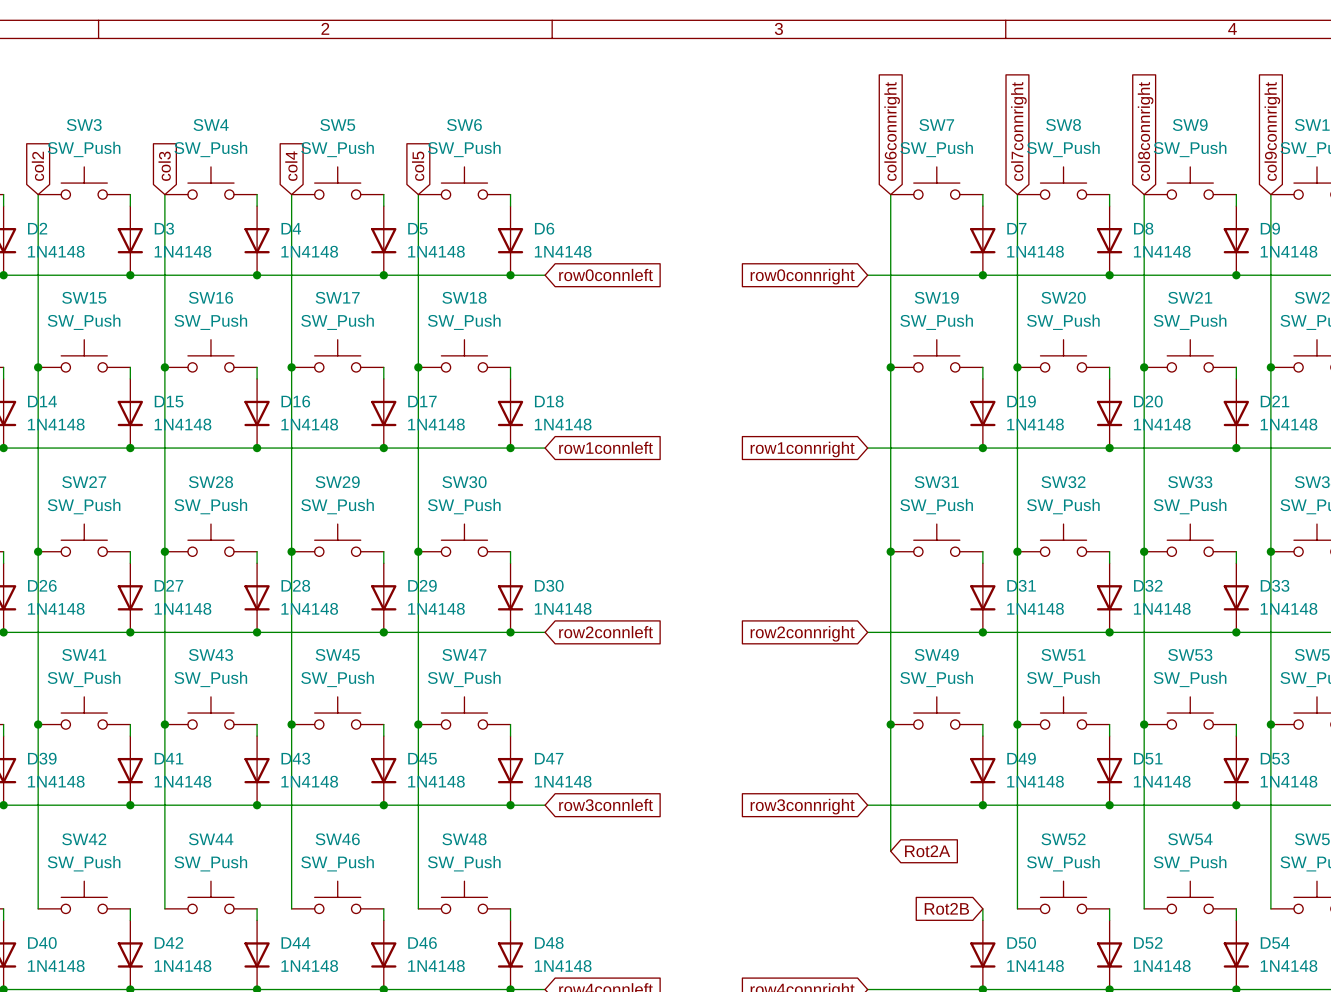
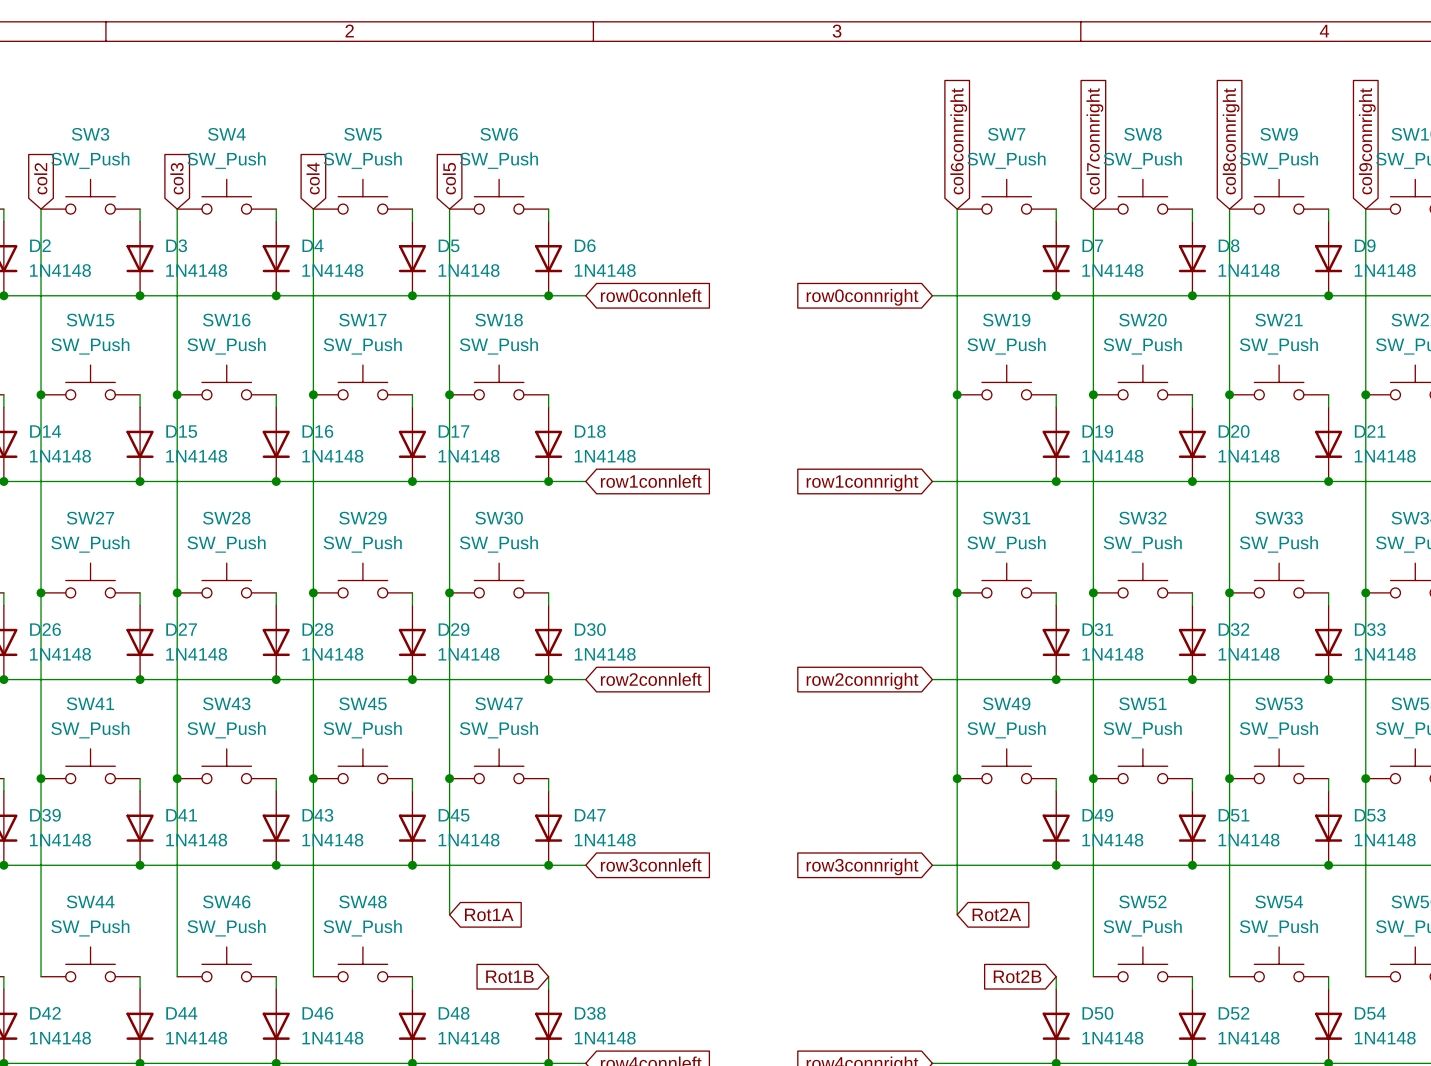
SW42 name: SW42 (84, 839) -> SW44 (90, 901)
SW44 name: SW44 (211, 839) -> SW46 (226, 901)
SW46 name: SW46 (337, 839) -> SW48 (362, 901)
wire: (418, 851) (418, 908) -> none
global label: none -> Rot1A (489, 914)
SW48: SW_Push (464, 897) -> none
global label: none -> Rot1B (509, 976)
D42 name: D42 (169, 942) -> D44 (181, 1013)
D40 name: D40 (42, 943) -> D42 (45, 1013)
D44 name: D44 (295, 943) -> D46 (317, 1013)
D46 name: D46 (422, 943) -> D48 (454, 1013)
D48 name: D48 (549, 943) -> D38 (590, 1013)

